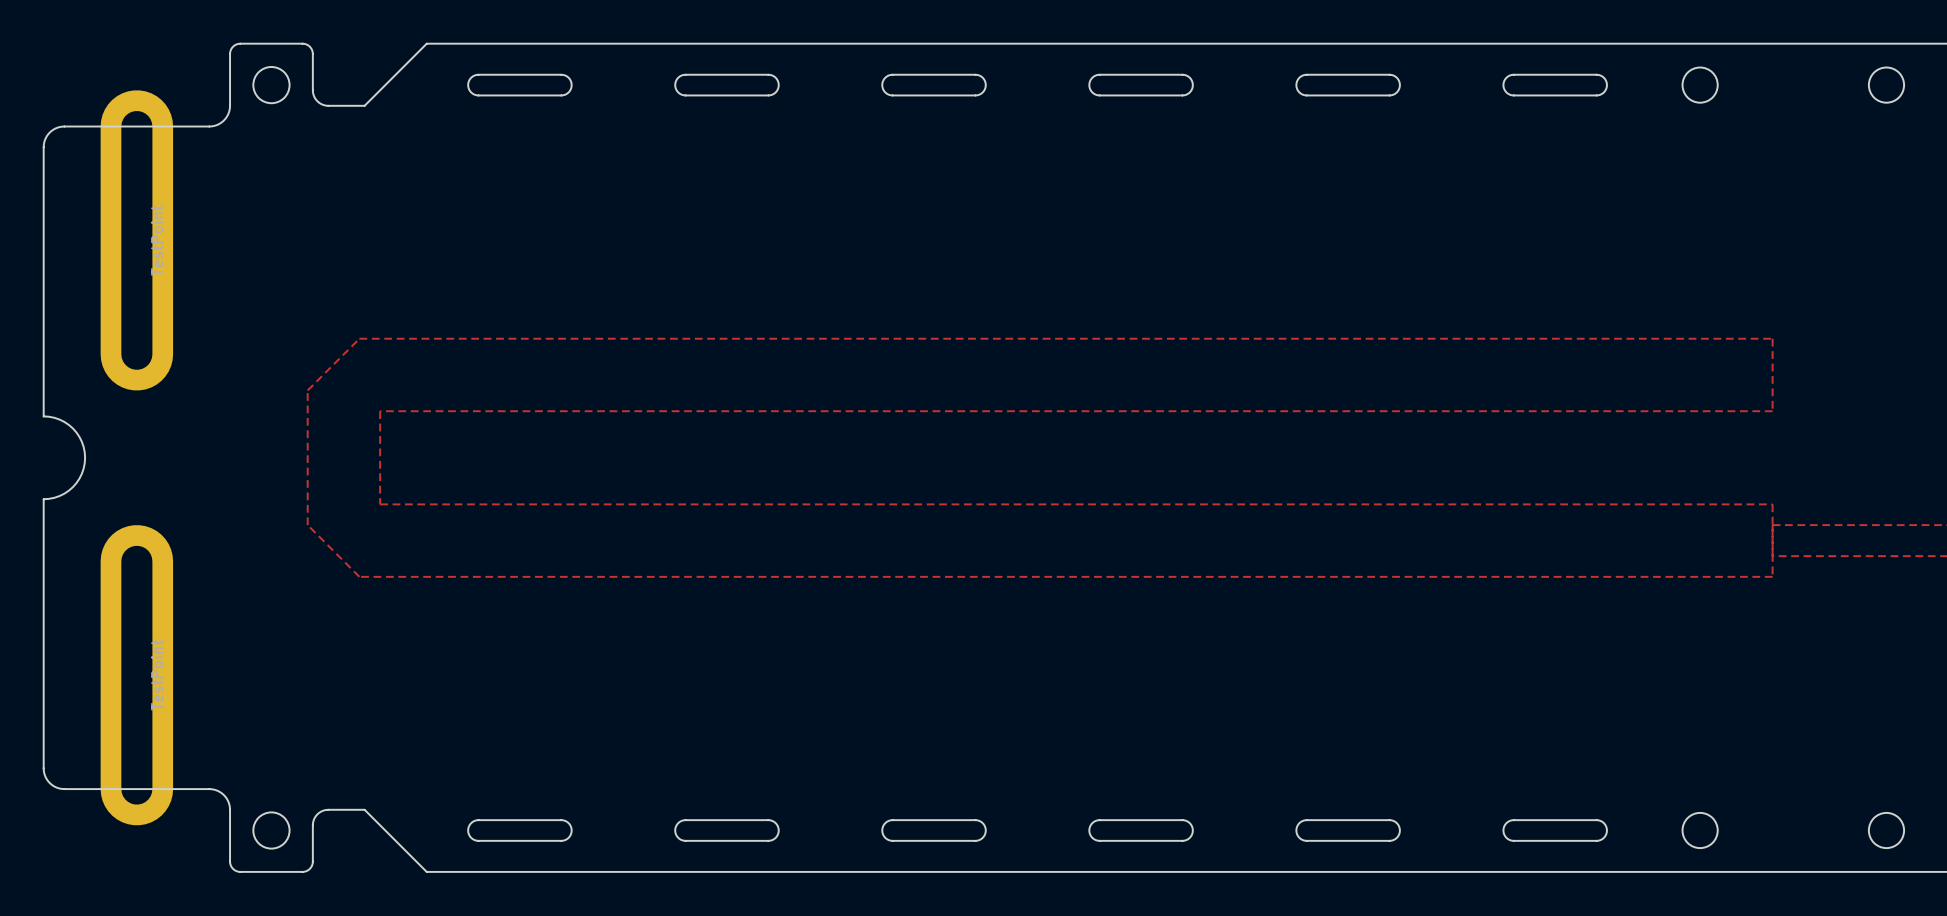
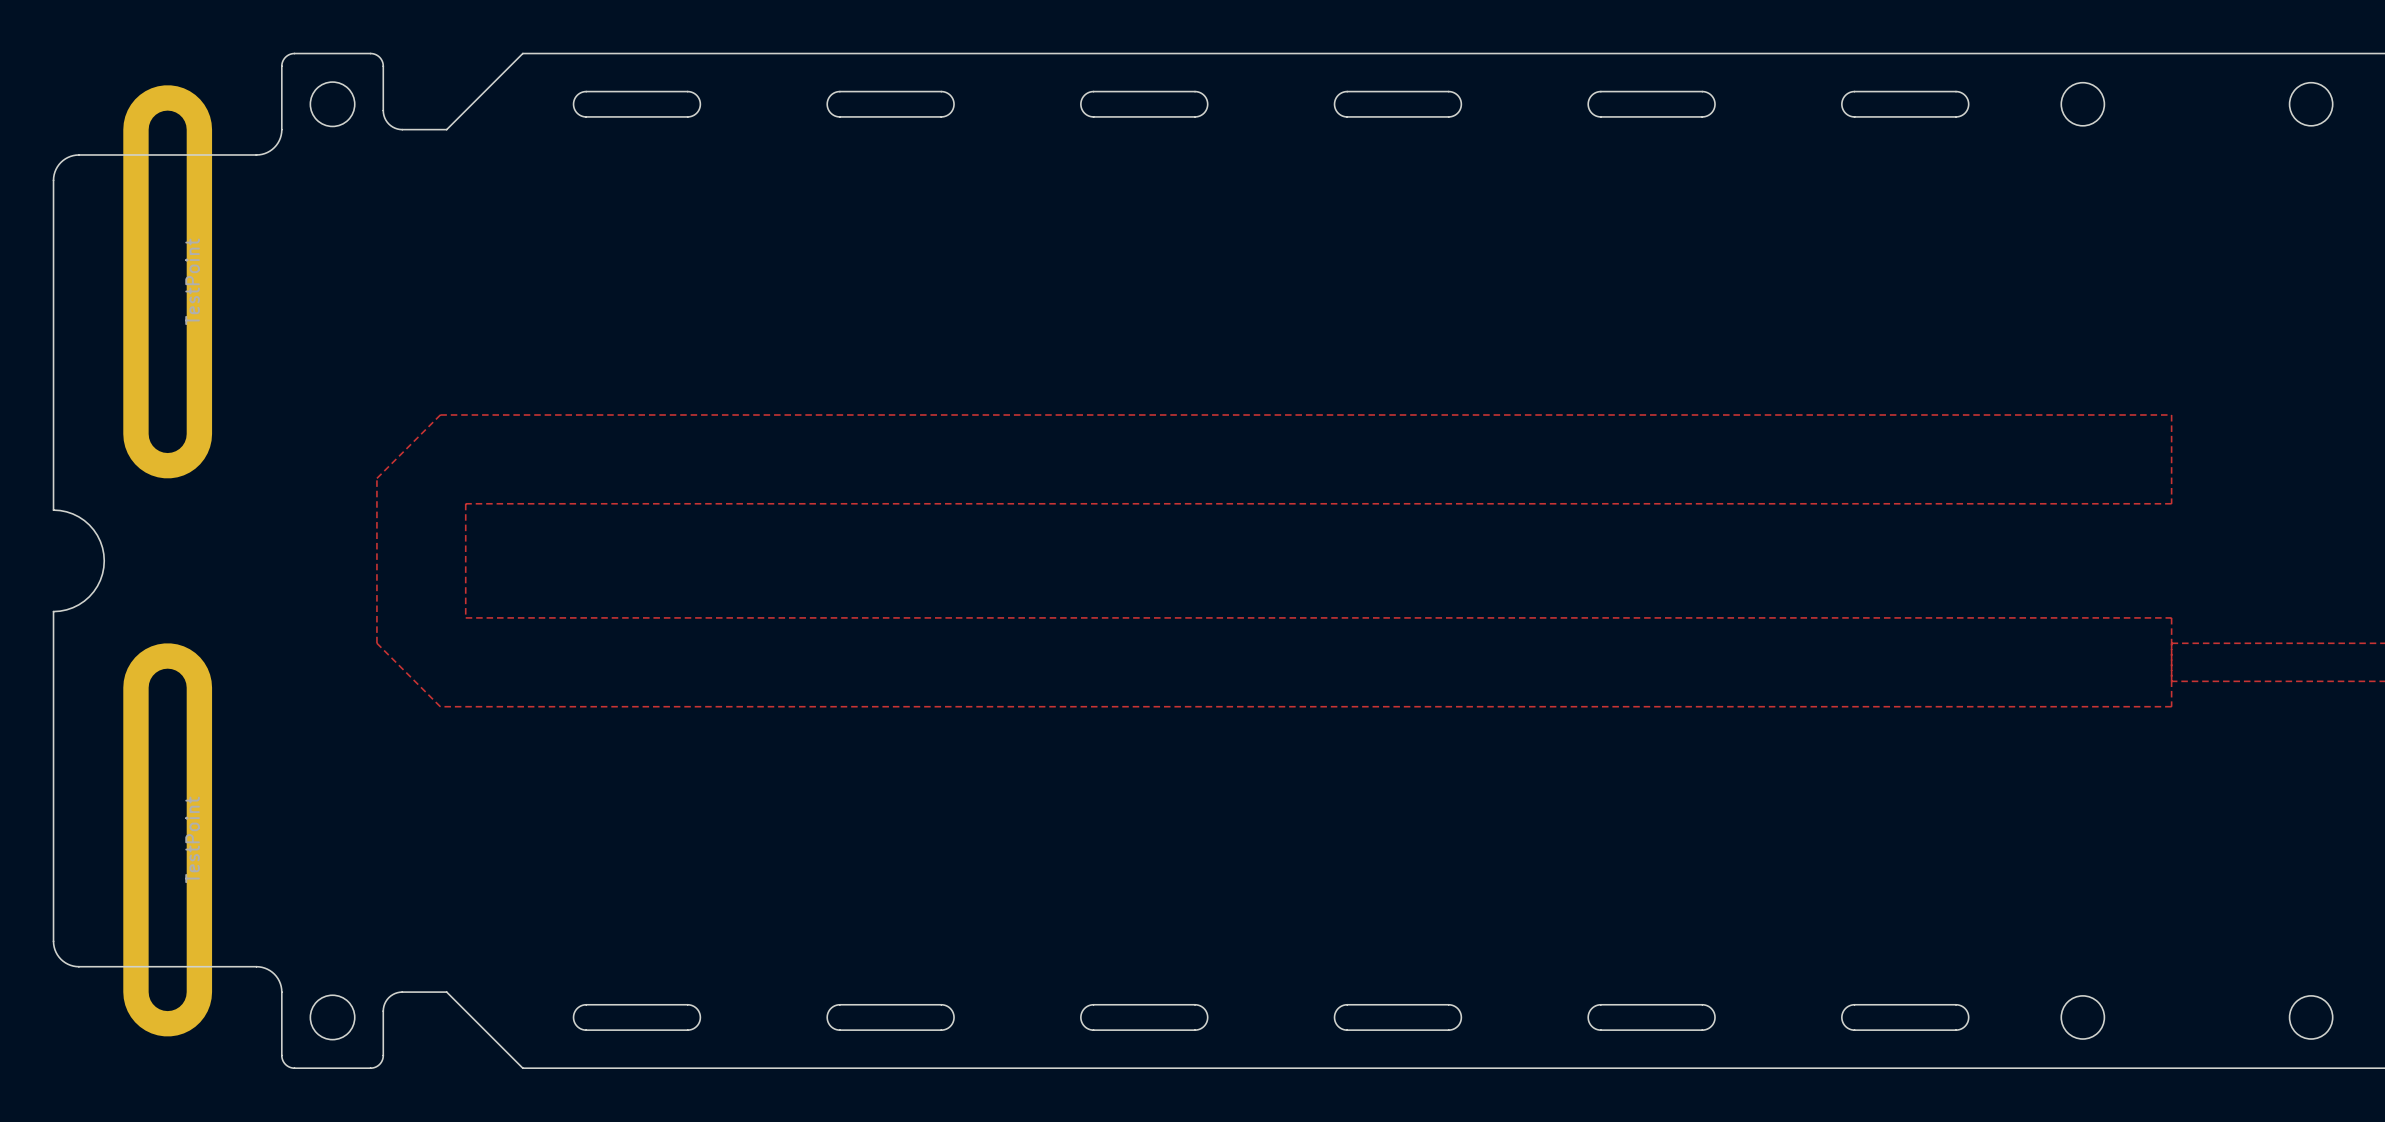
part footprint: [100, 90, 174, 391] -> [123, 85, 213, 479]
part footprint: [100, 525, 174, 826] -> [123, 643, 213, 1037]

